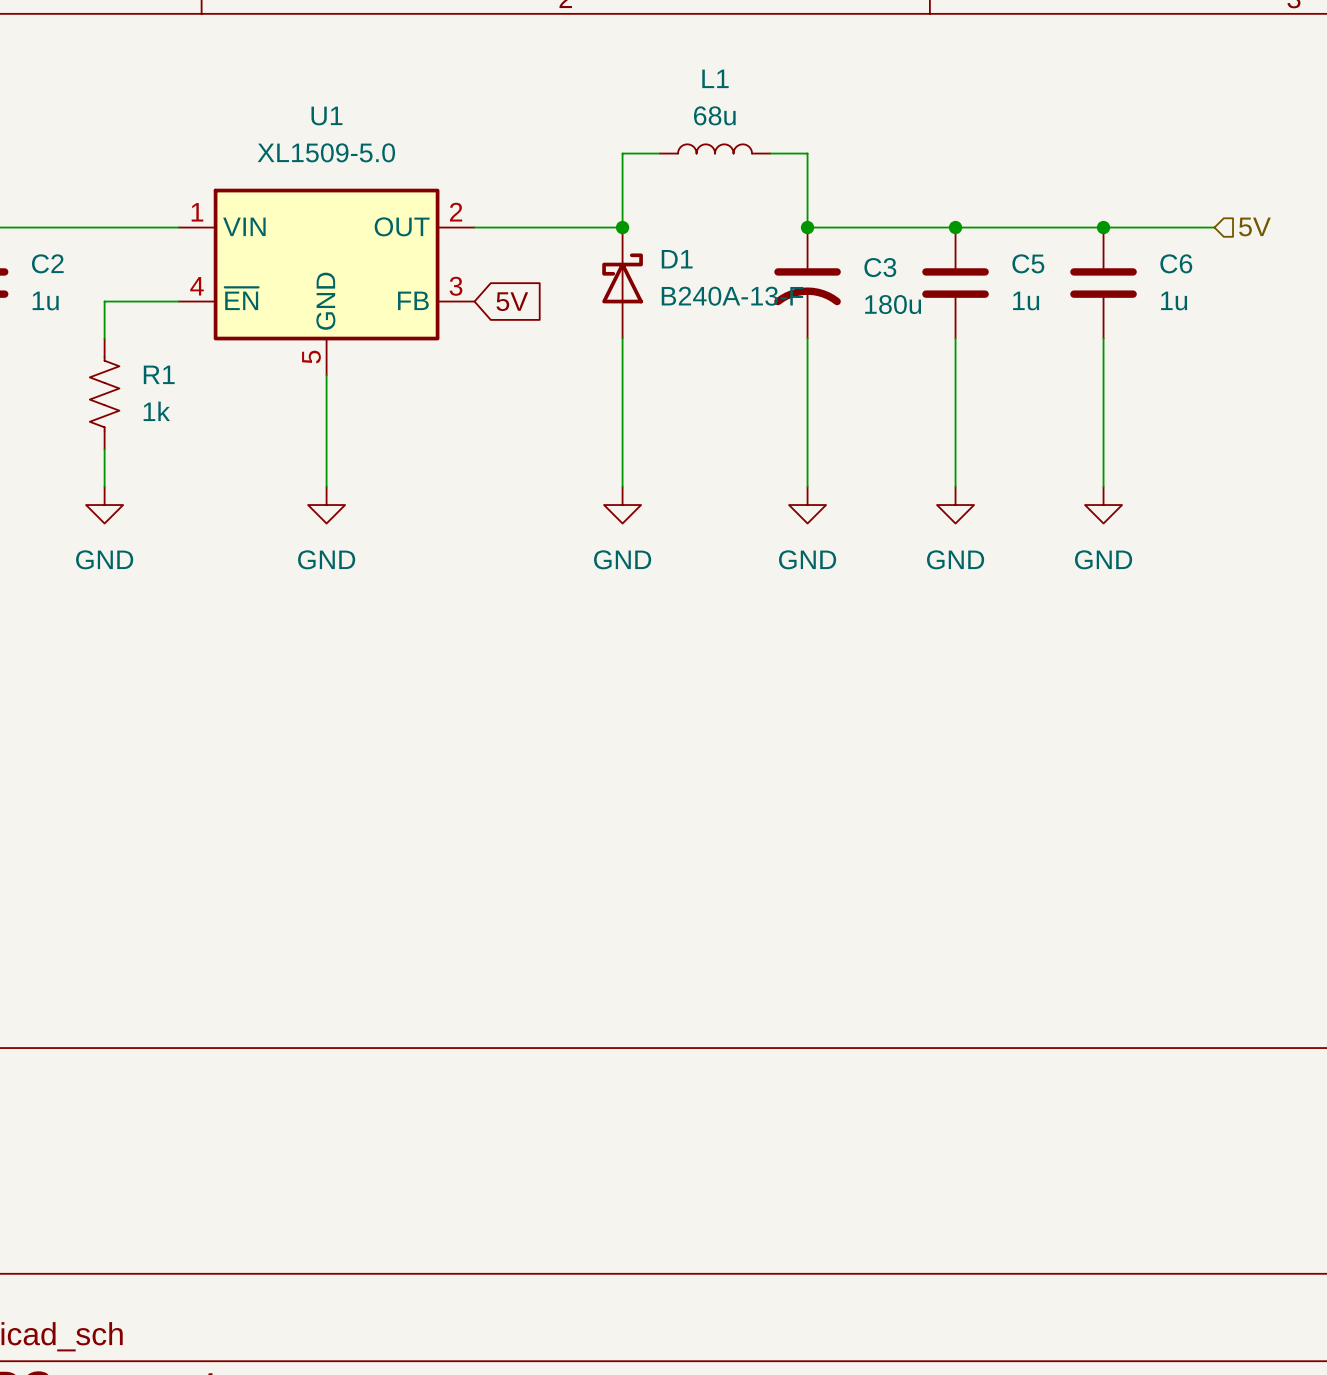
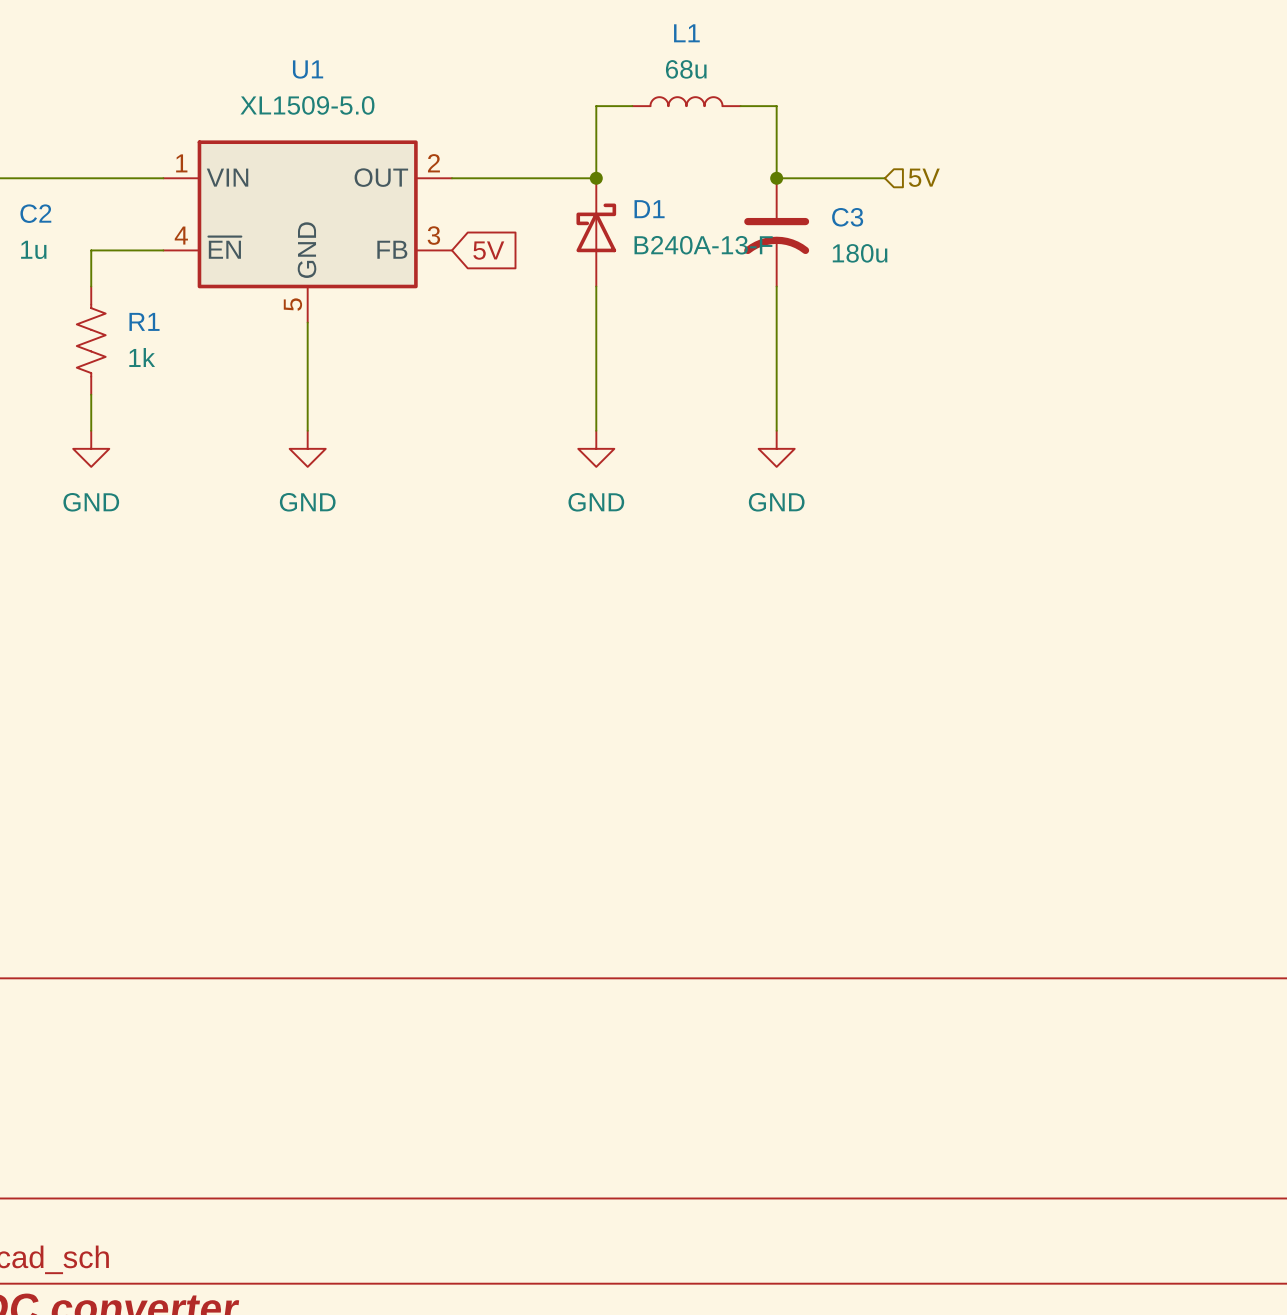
hierarchical label position: 5V (1254, 226) -> 5V (924, 177)
wire: (918, 227) (1214, 227) -> none
junction: (955, 227) -> none
junction: (1103, 227) -> none
C5: 1u (955, 283) -> none
C6: 1u (1103, 283) -> none
wire: (955, 338) (955, 486) -> none
wire: (1103, 338) (1103, 486) -> none
power symbol: GND (955, 505) -> none
power symbol: GND (1103, 505) -> none

